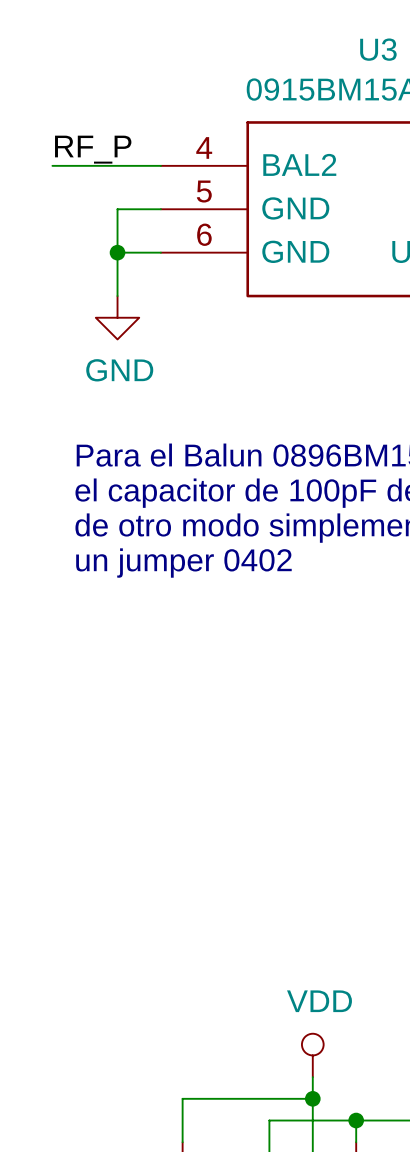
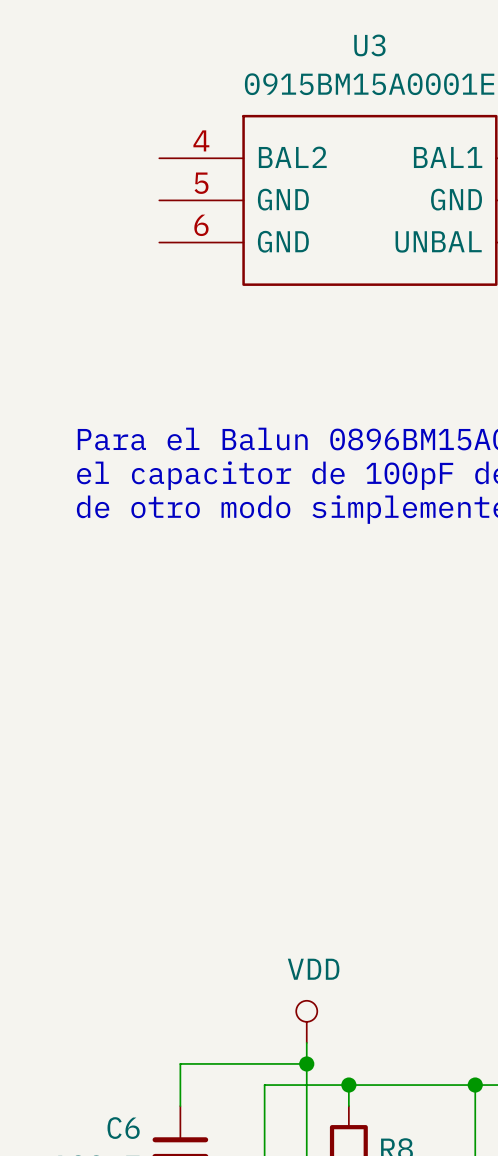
label: RF_P (93, 149) -> none
wire: (52, 165) (160, 165) -> none
wire: (160, 209) (117, 209) (117, 296) -> none
wire: (117, 252) (160, 252) -> none
junction: (117, 252) -> none
power symbol: GND (117, 317) -> none
text: un jumper 0402 (183, 563) -> none

